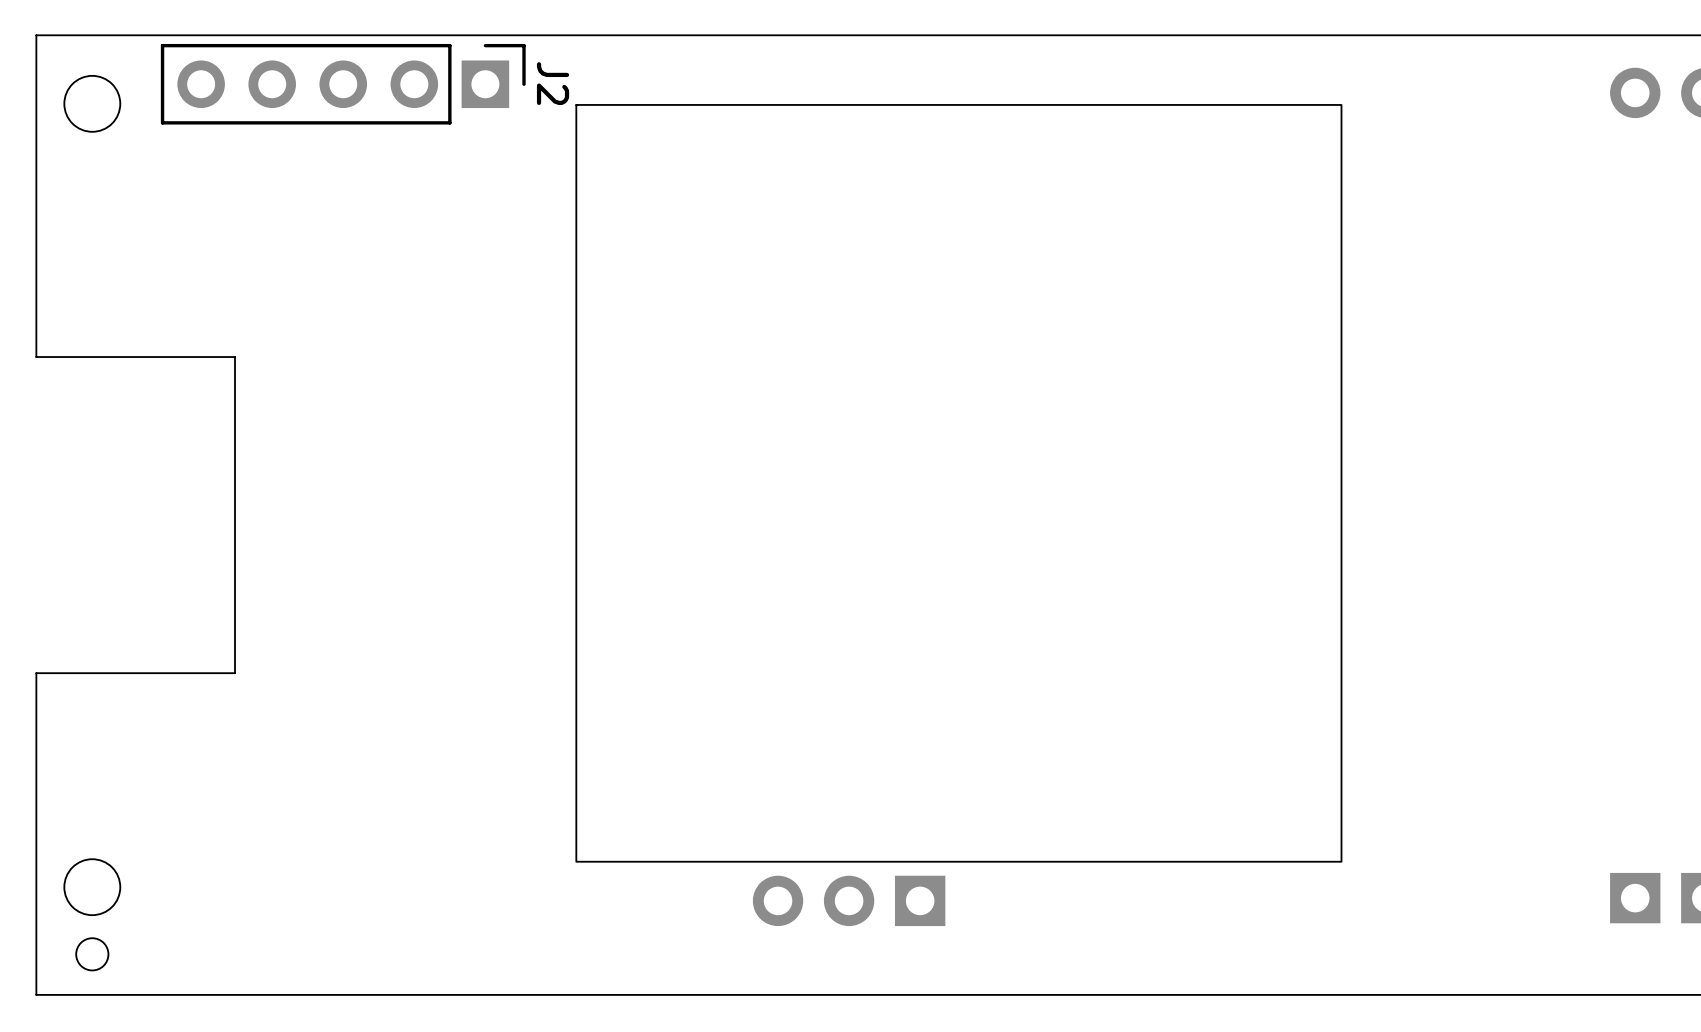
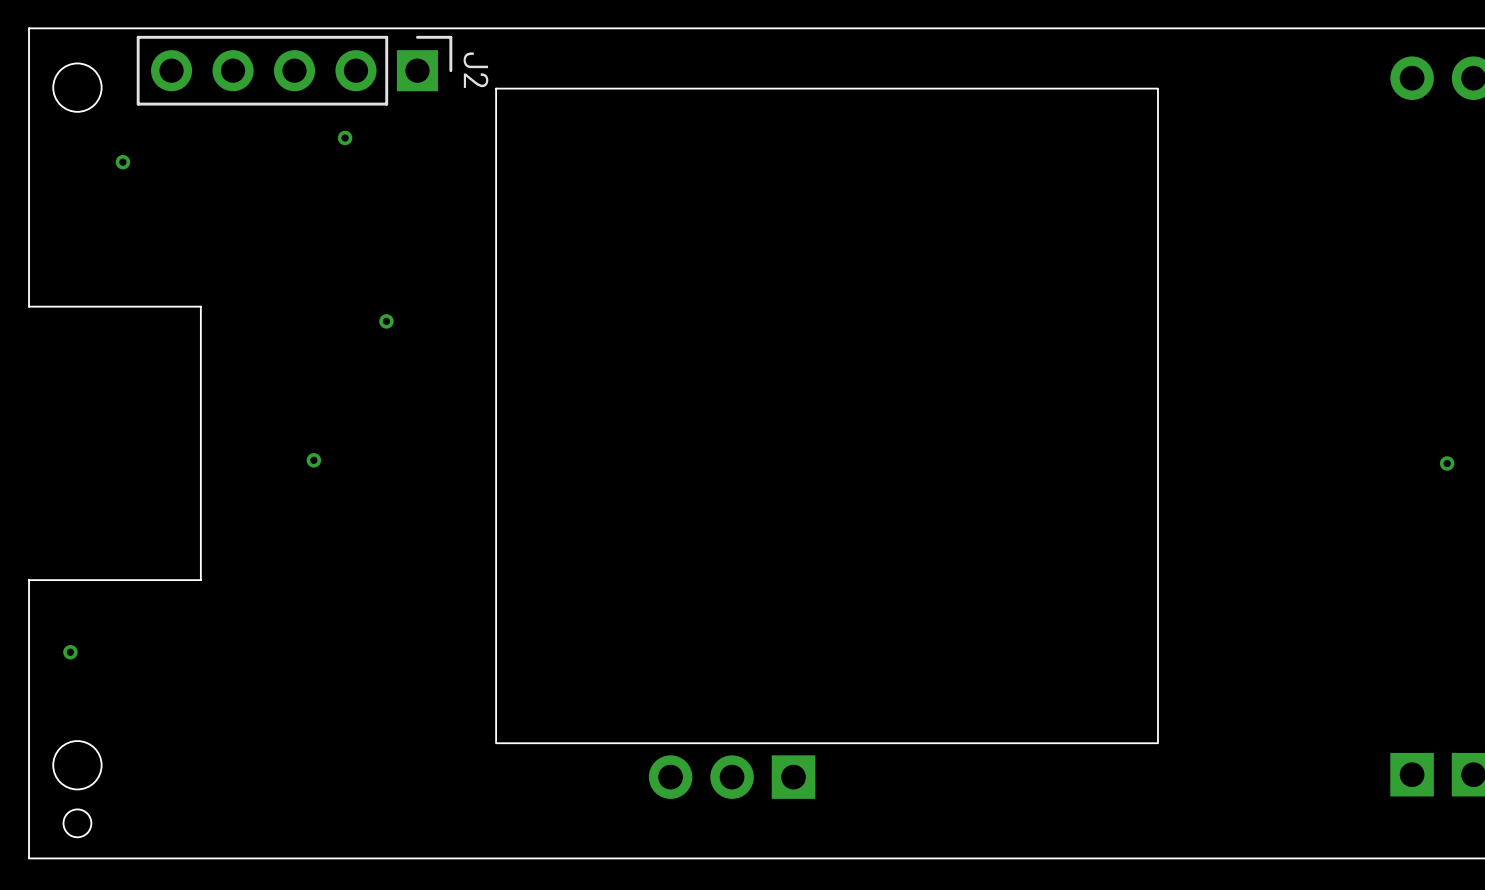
via: none -> (345, 137)
via: none -> (122, 162)
via: none -> (386, 321)
via: none -> (313, 460)
via: none -> (1447, 463)
via: none -> (70, 652)

